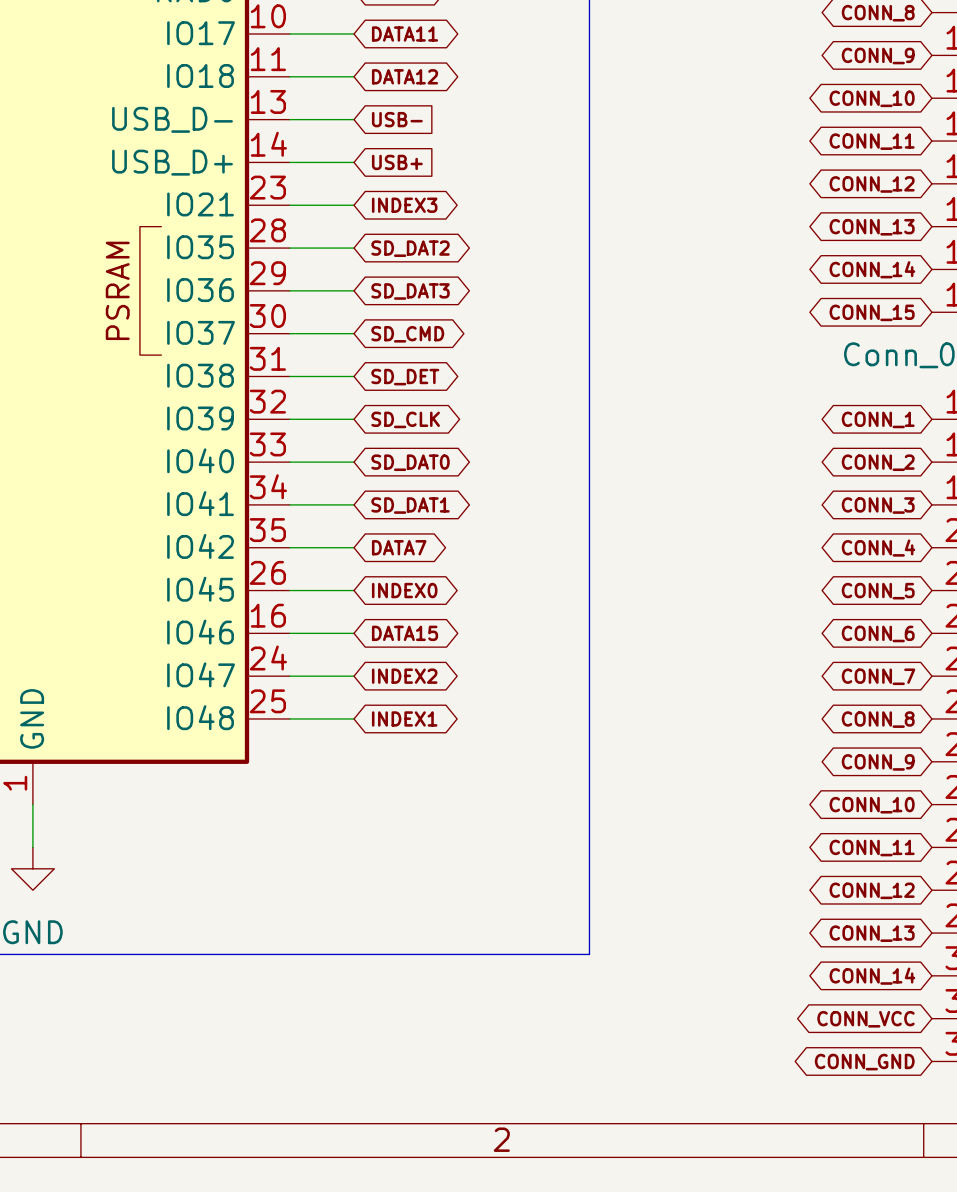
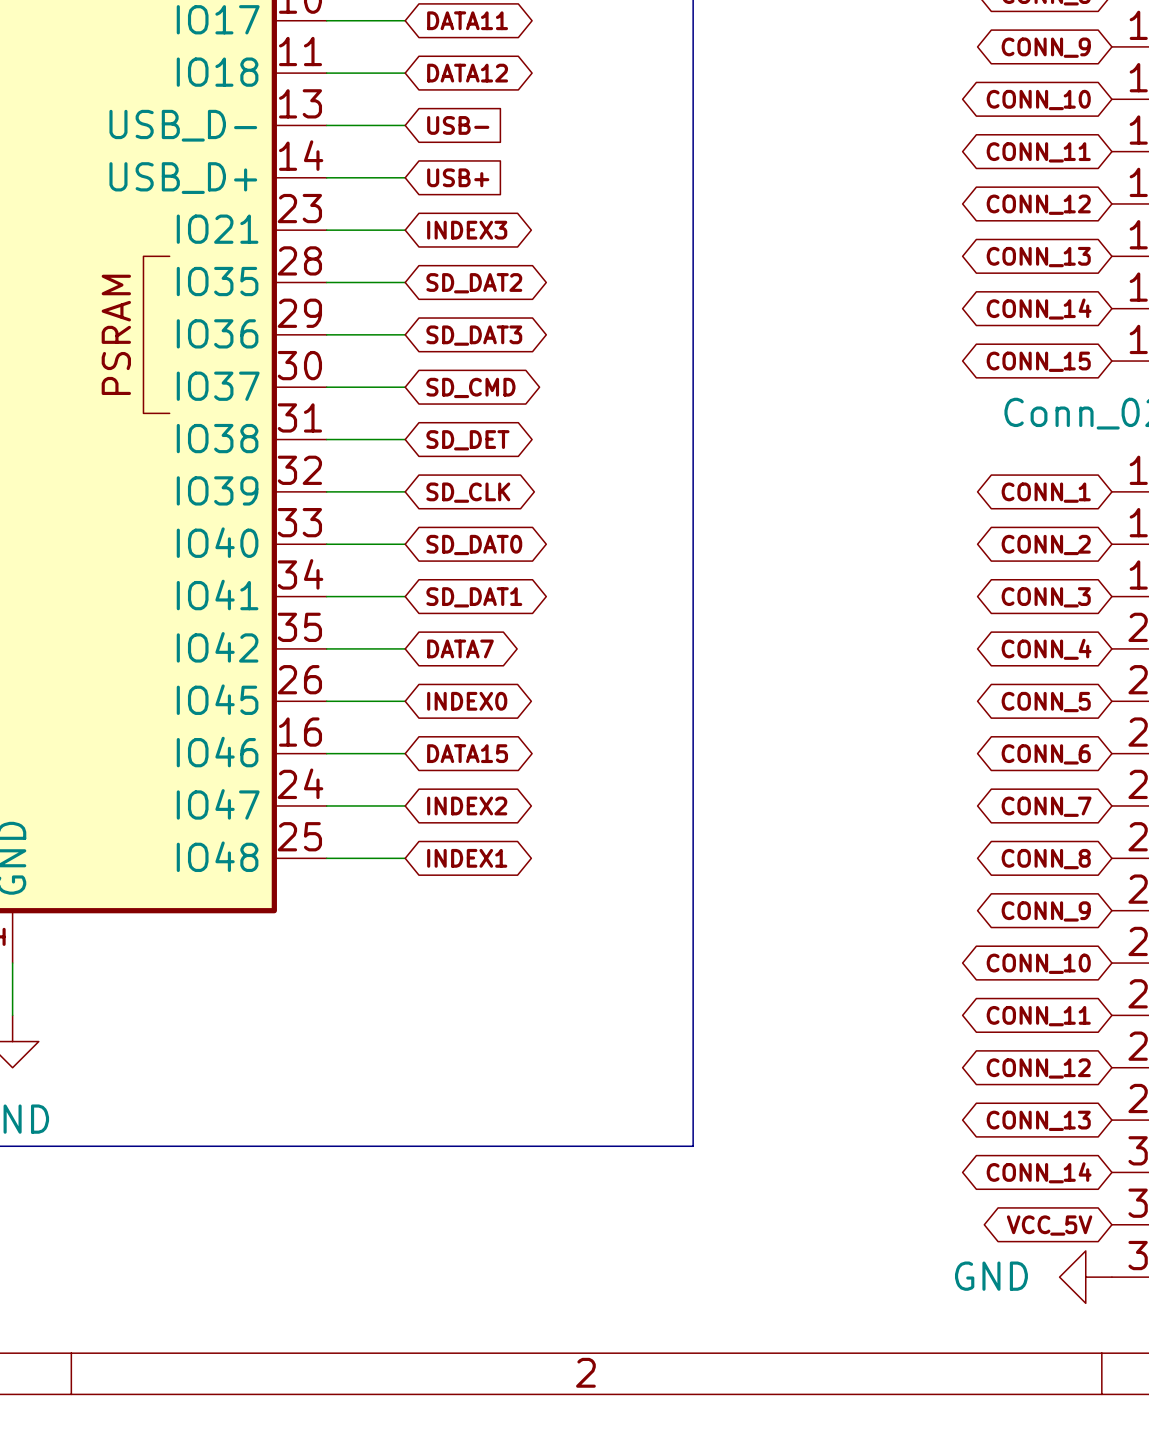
global label: CONN_VCC (865, 1019) -> VCC_5V (1049, 1225)
power symbol: none -> GND (1085, 1277)
global label: CONN_GND (864, 1062) -> none

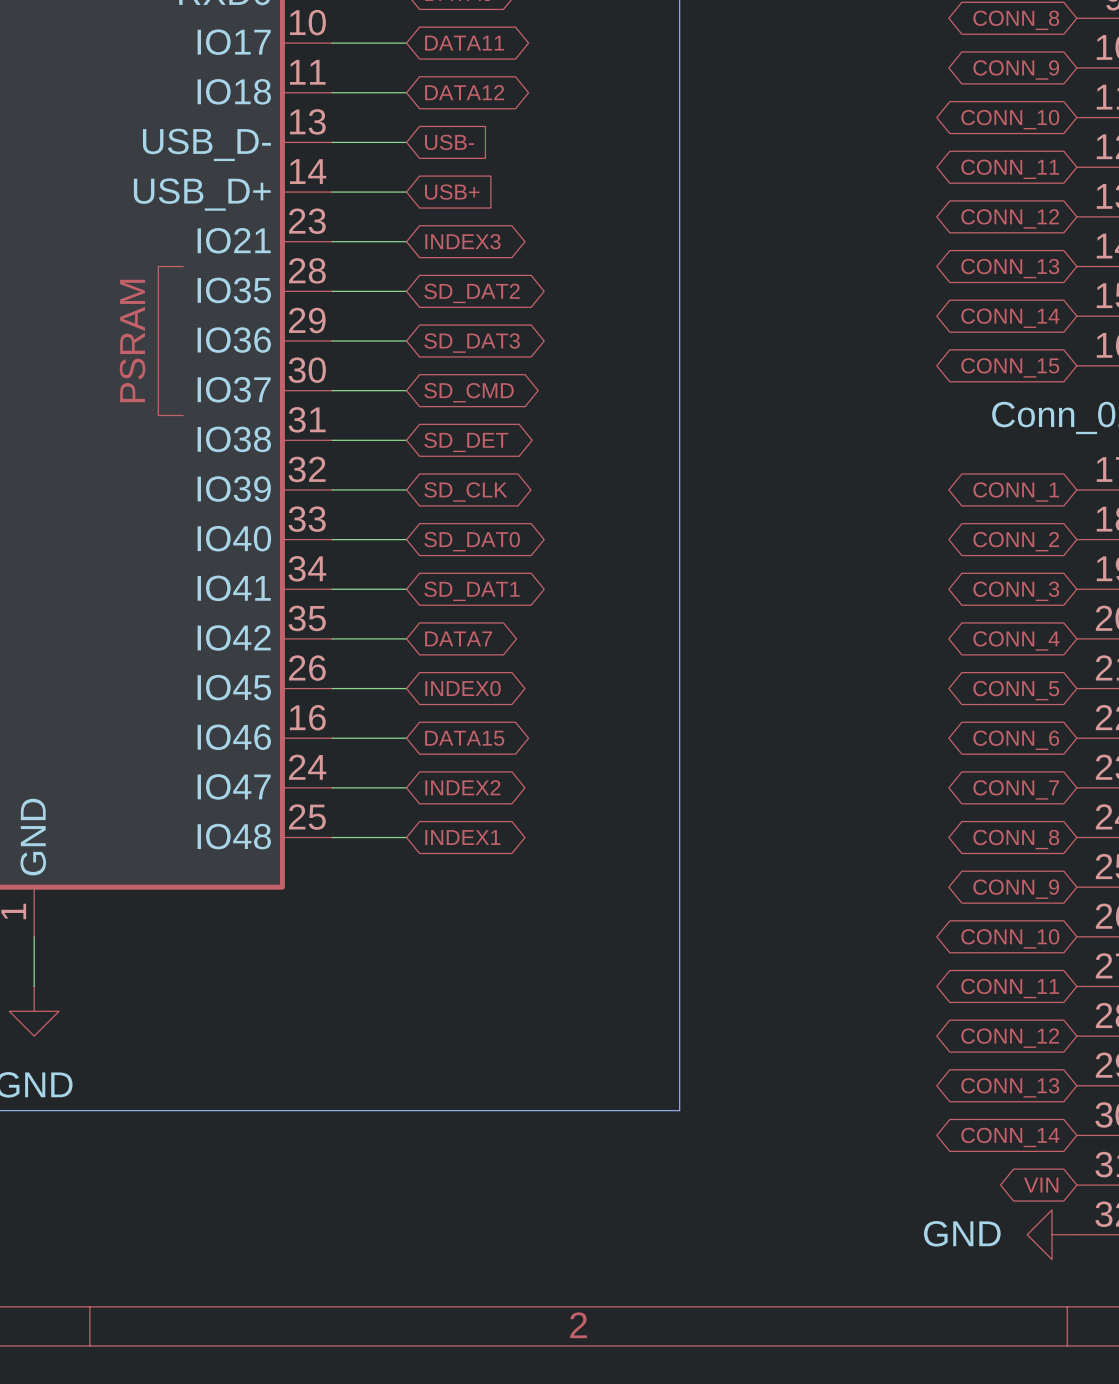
global label: VCC_5V (1049, 1225) -> VIN (1041, 1185)

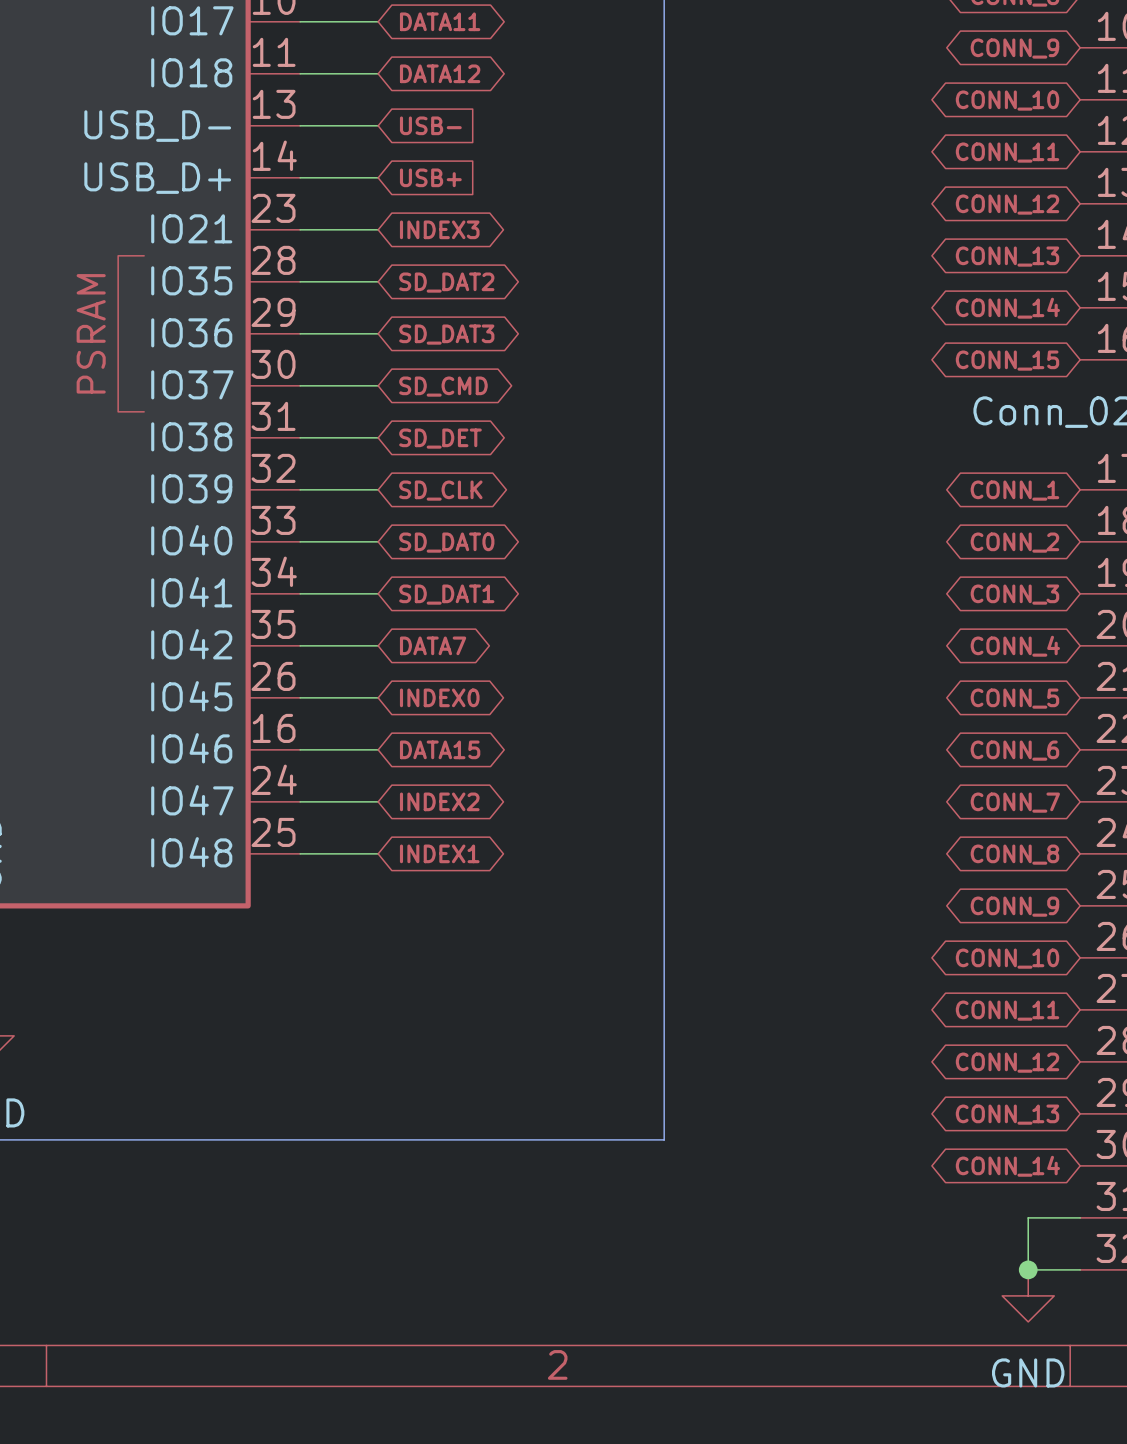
global label: VIN (1041, 1185) -> none
wire: none -> (1080, 1217) (1028, 1217) (1028, 1269) (1080, 1269)
junction: none -> (1028, 1269)
power symbol rotation: 0° (1052, 1234) -> 90° counterclockwise (1028, 1295)
power symbol position: GND (1052, 1234) -> GND (1028, 1295)

